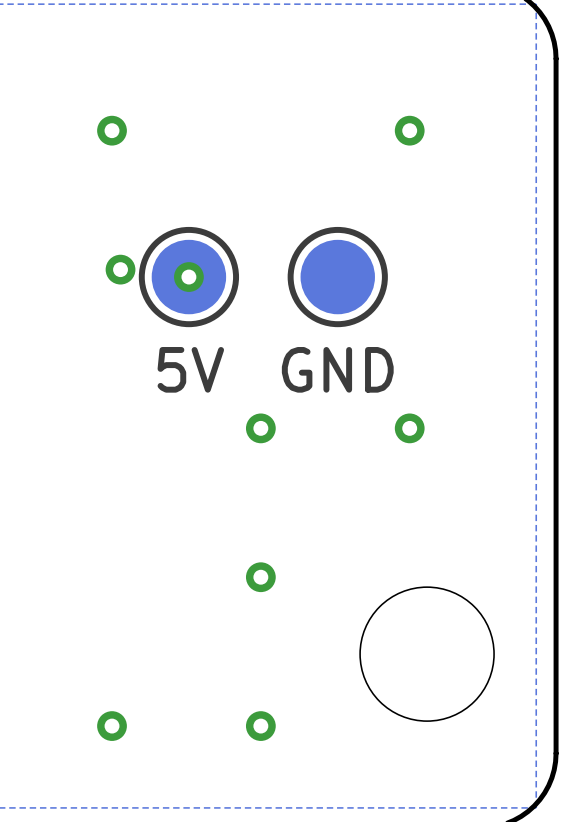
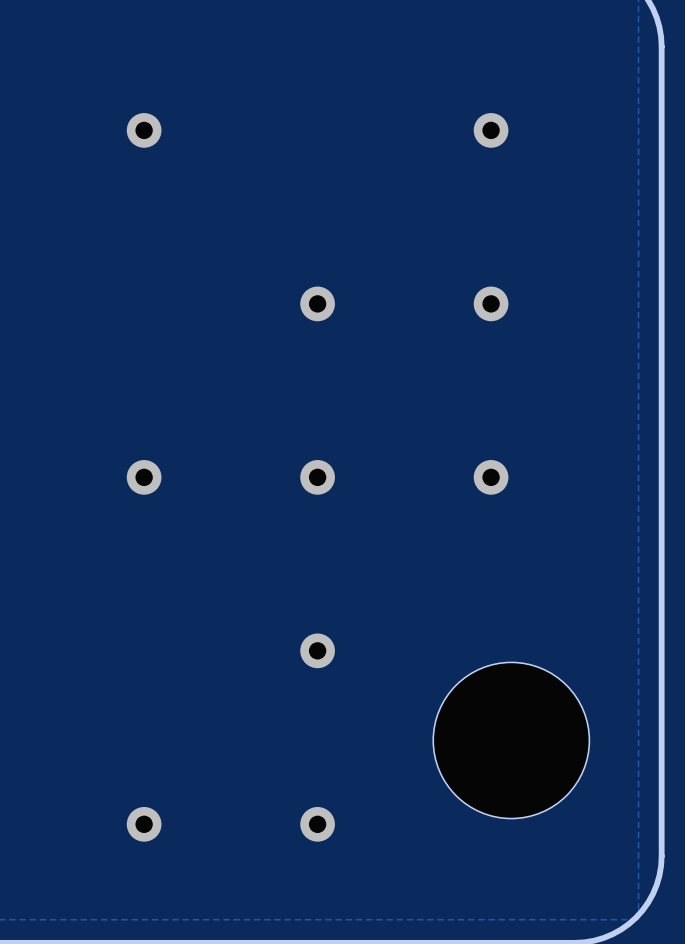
via: (120, 269) -> none
part: (188, 277) -> none
via: (188, 277) -> none
part: (337, 277) -> none
via: none -> (317, 303)
via: none -> (491, 303)
text: 5V (190, 369) -> none
text: GND (337, 369) -> none
via: none -> (144, 477)

